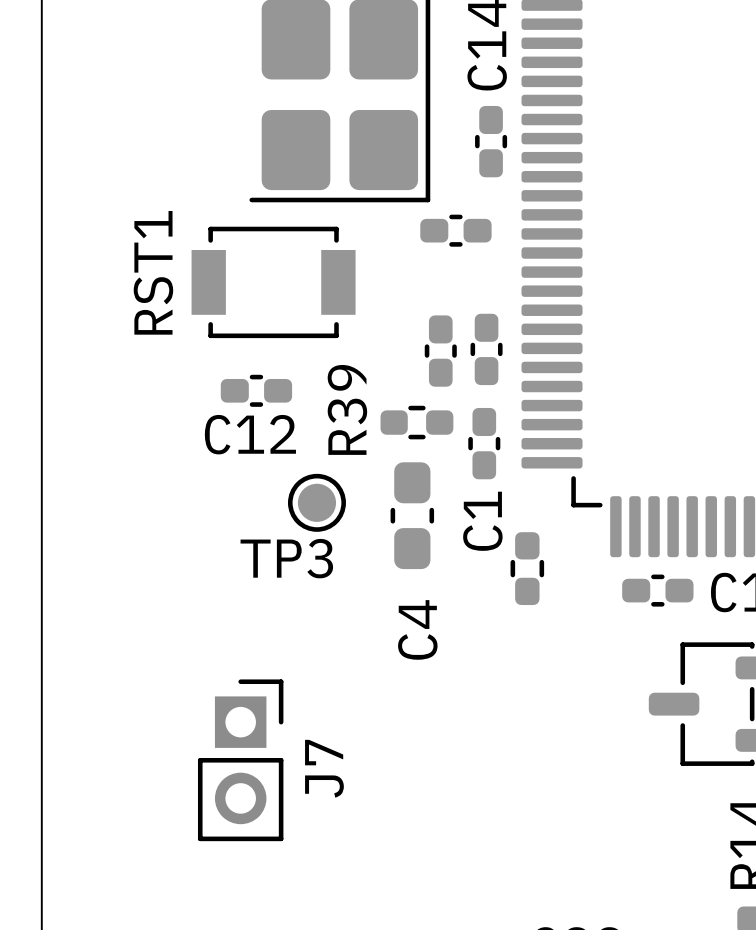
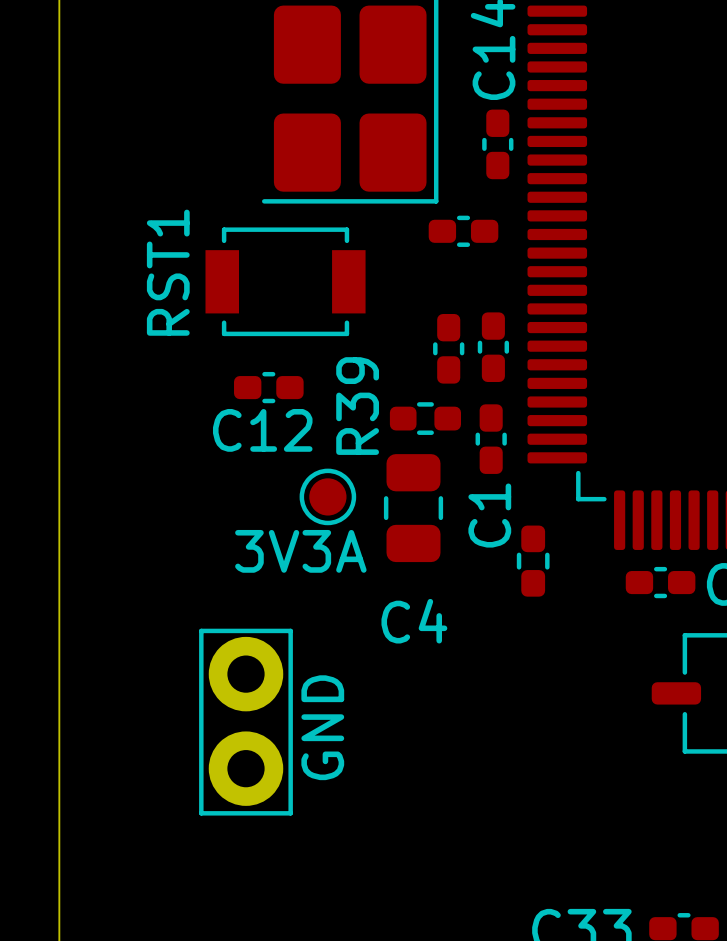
C4 footprint: [390, 462, 435, 570] -> [383, 454, 444, 563]
TP3 name: TP3 (286, 558) -> 3V3A (300, 551)
C4 name rotation: 0° (417, 629) -> 90° clockwise (414, 621)
GND: none -> (245, 722)
J7: (240, 760) -> none

